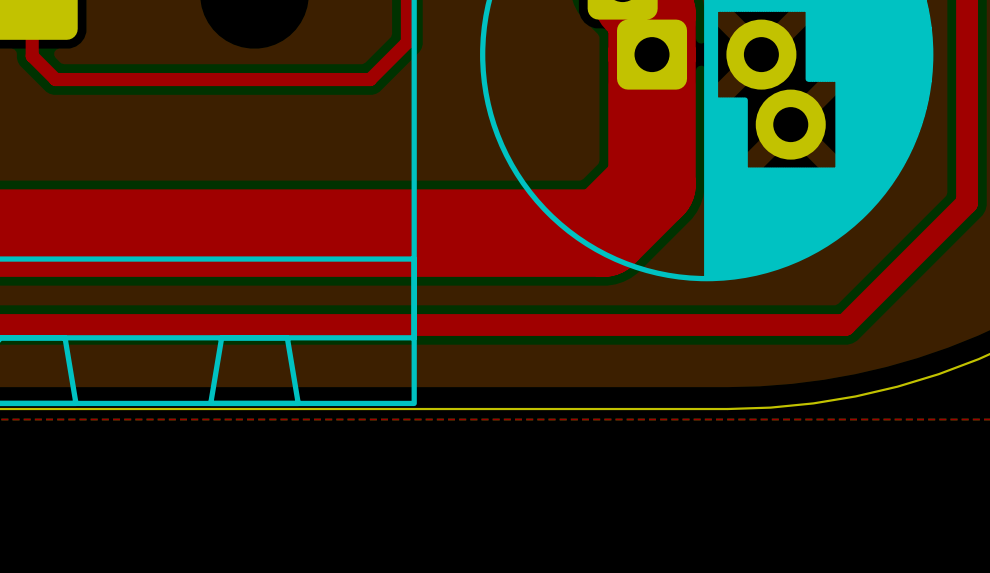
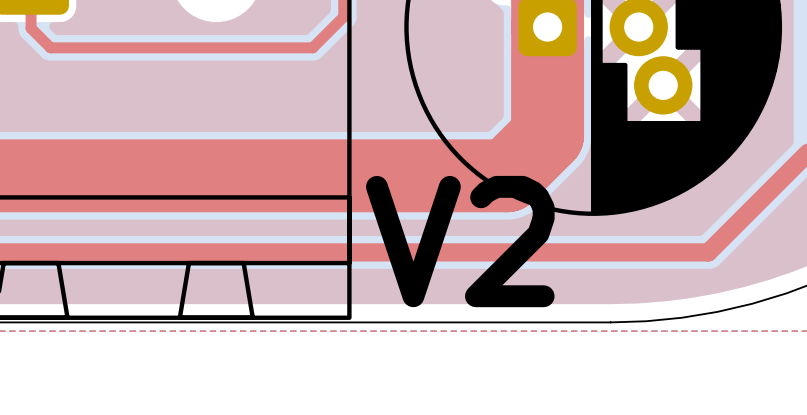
text: none -> V2 (460, 241)

